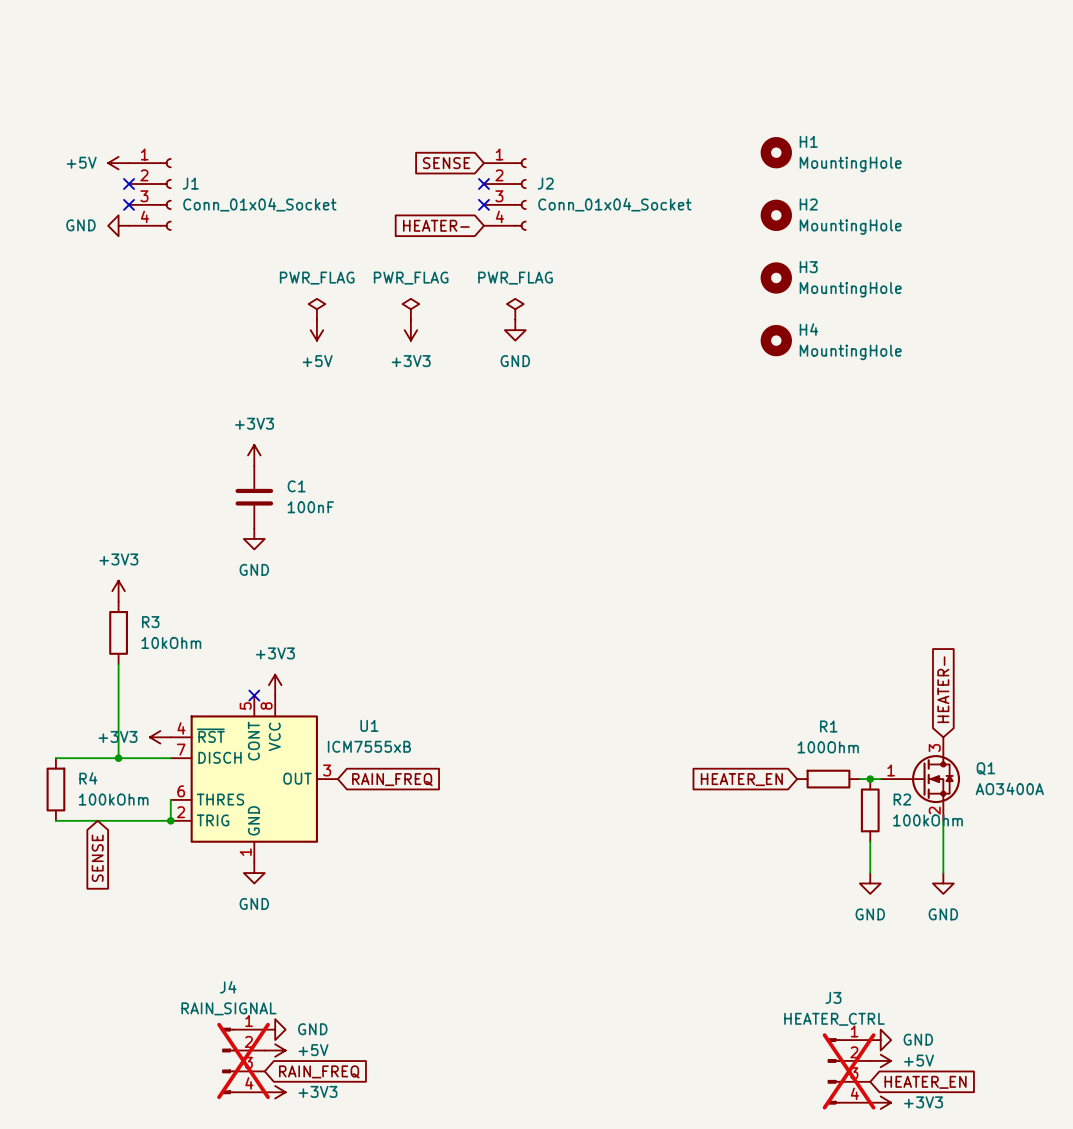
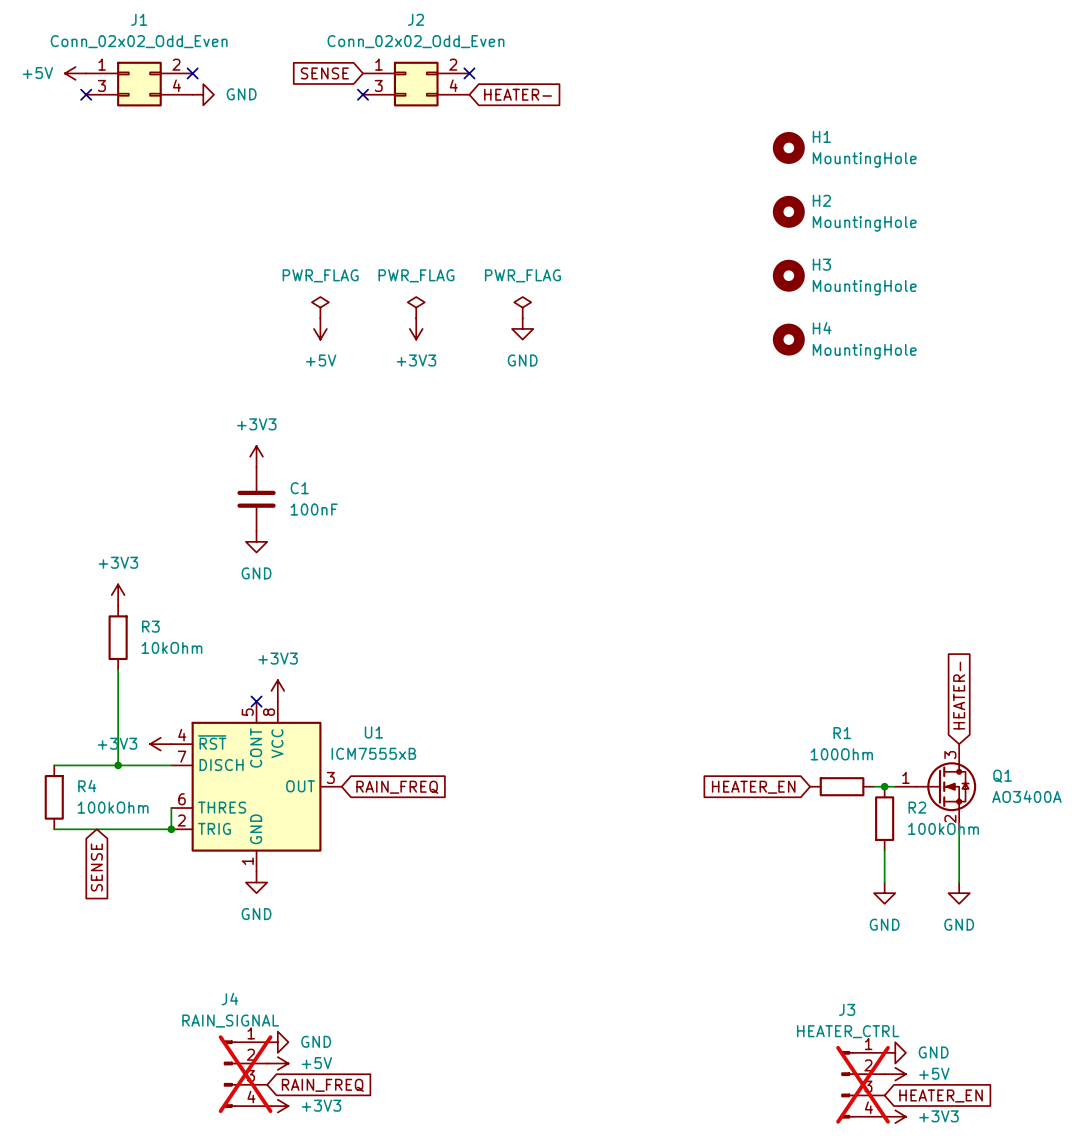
no-connect mark: none -> (192, 73)
no-connect mark: none -> (469, 73)
no-connect mark: none -> (86, 94)
no-connect mark: none -> (362, 94)
J1 symbol: [129, 158, 172, 231] -> [86, 61, 193, 107]
J2 symbol: [483, 158, 527, 231] -> [362, 61, 470, 107]
power symbol position: +5V (118, 163) -> +5V (75, 73)
global label position: SENSE (446, 163) -> SENSE (324, 73)
J1 name position: J1 (190, 183) -> J1 (139, 19)
J2 name position: J2 (545, 183) -> J2 (415, 19)
no-connect mark: (129, 184) -> none
no-connect mark: (483, 184) -> none
no-connect mark: (129, 204) -> none
J1 value: Conn_01x04_Socket (259, 204) -> Conn_02x02_Odd_Even (139, 41)
no-connect mark: (483, 204) -> none
J2 value: Conn_01x04_Socket (614, 204) -> Conn_02x02_Odd_Even (415, 41)
power symbol rotation: 0° (118, 225) -> 180° (203, 94)
power symbol position: GND (118, 225) -> GND (203, 94)
global label rotation: 0° (436, 225) -> 180° (518, 94)
global label position: HEATER- (436, 225) -> HEATER- (518, 94)

